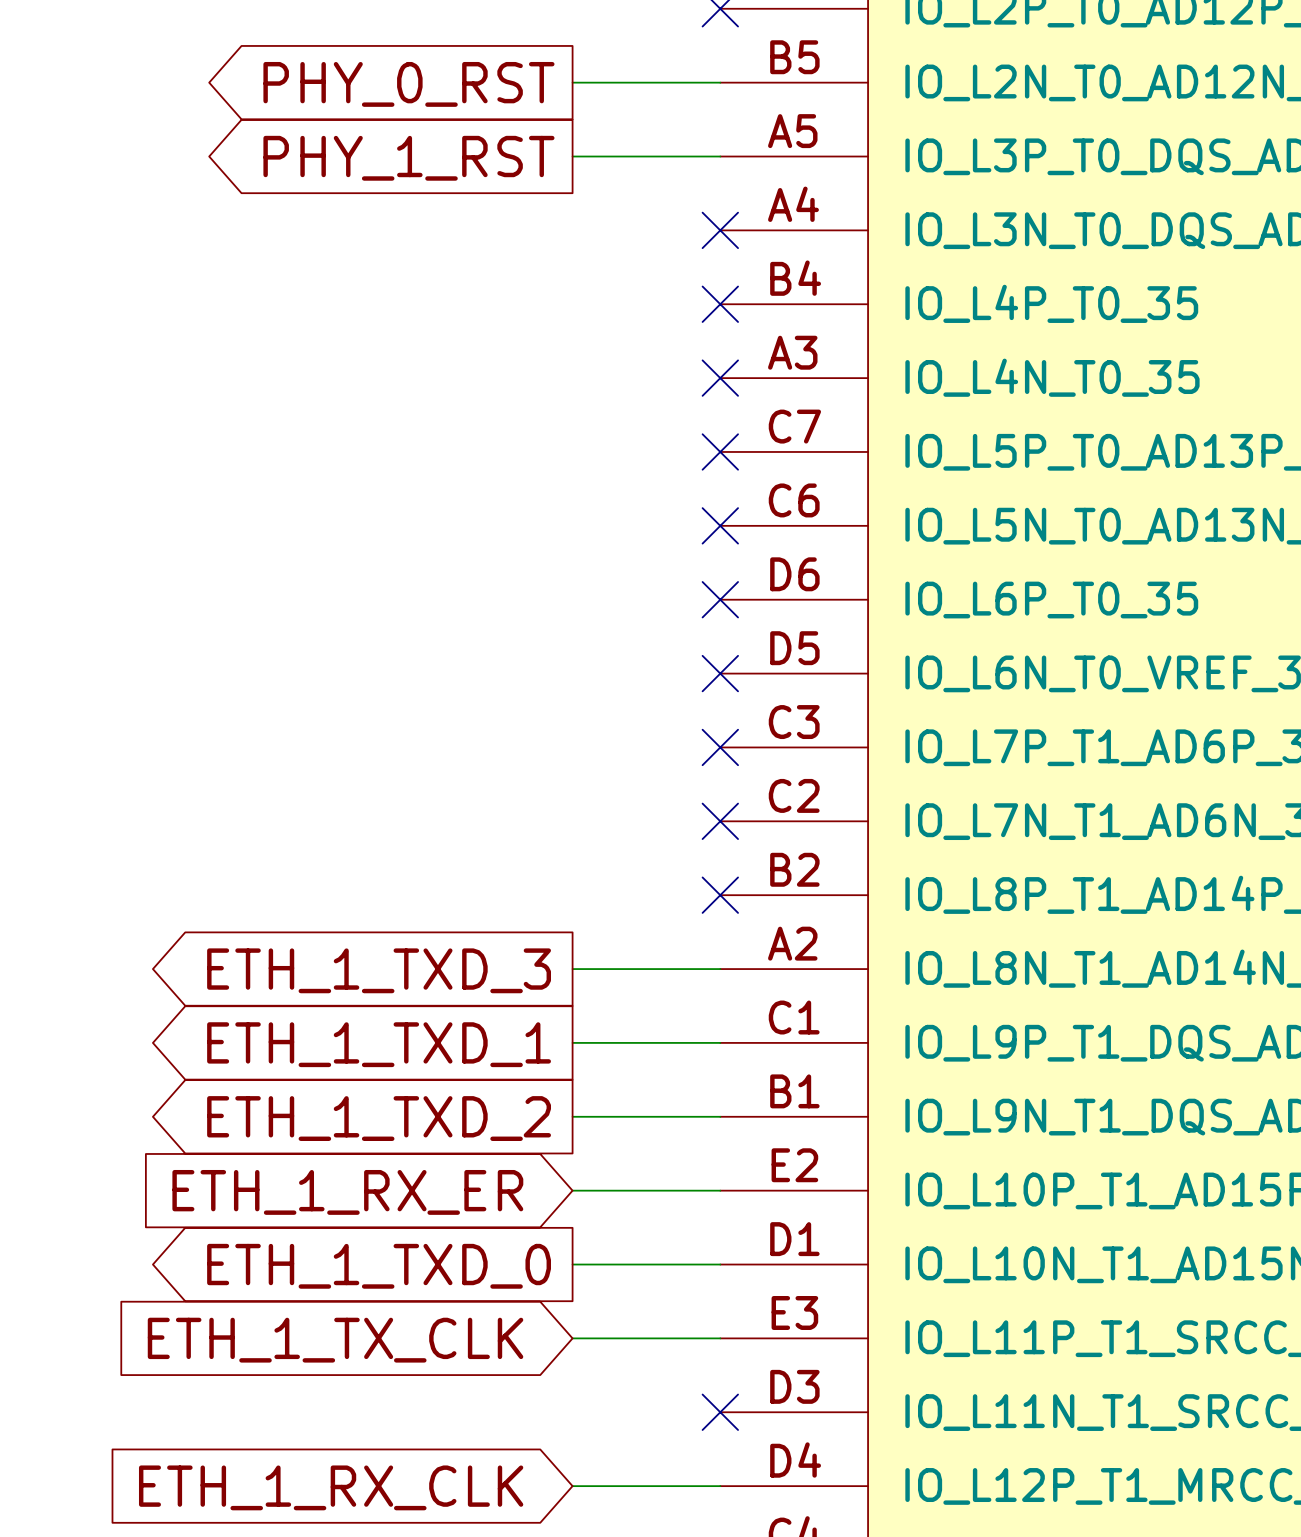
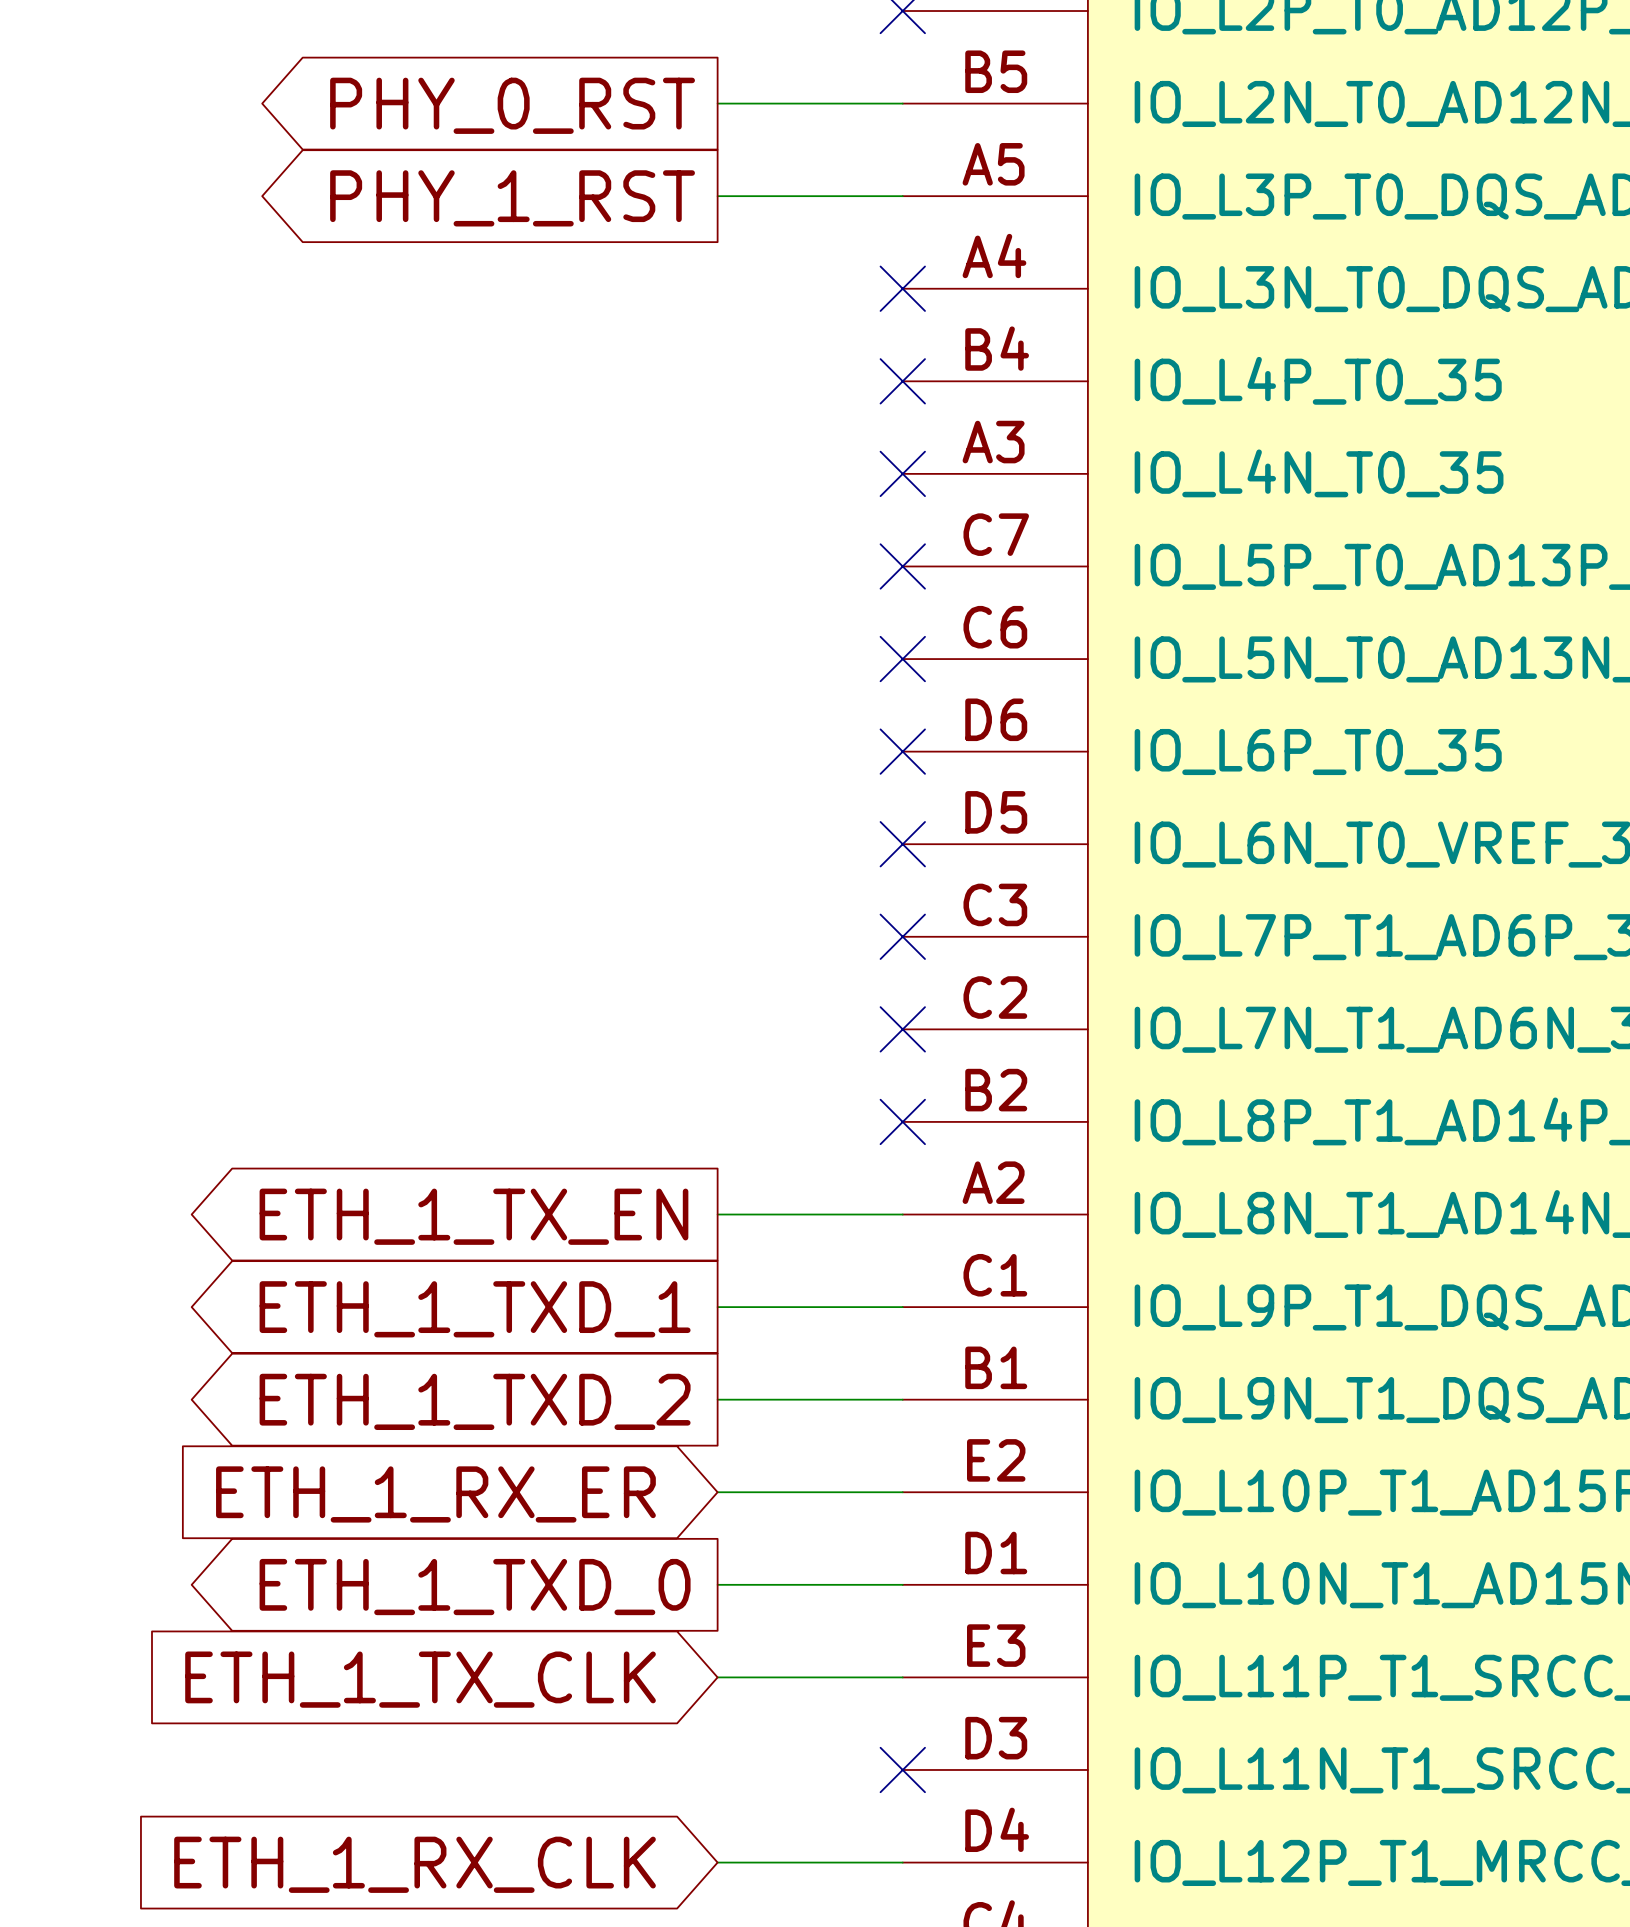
global label: ETH_1_TXD_3 (379, 970) -> ETH_1_TX_EN (473, 1216)

